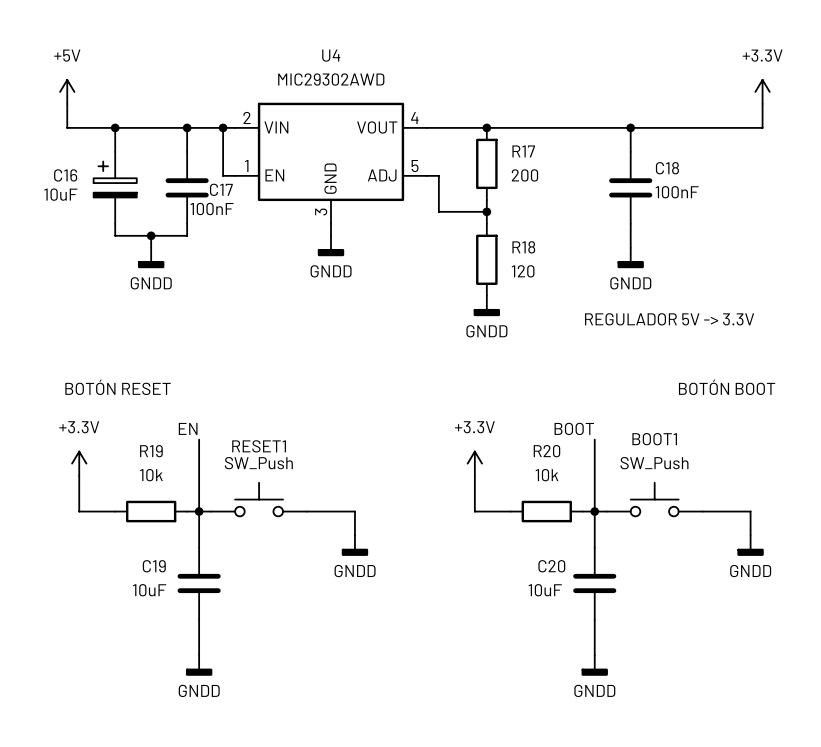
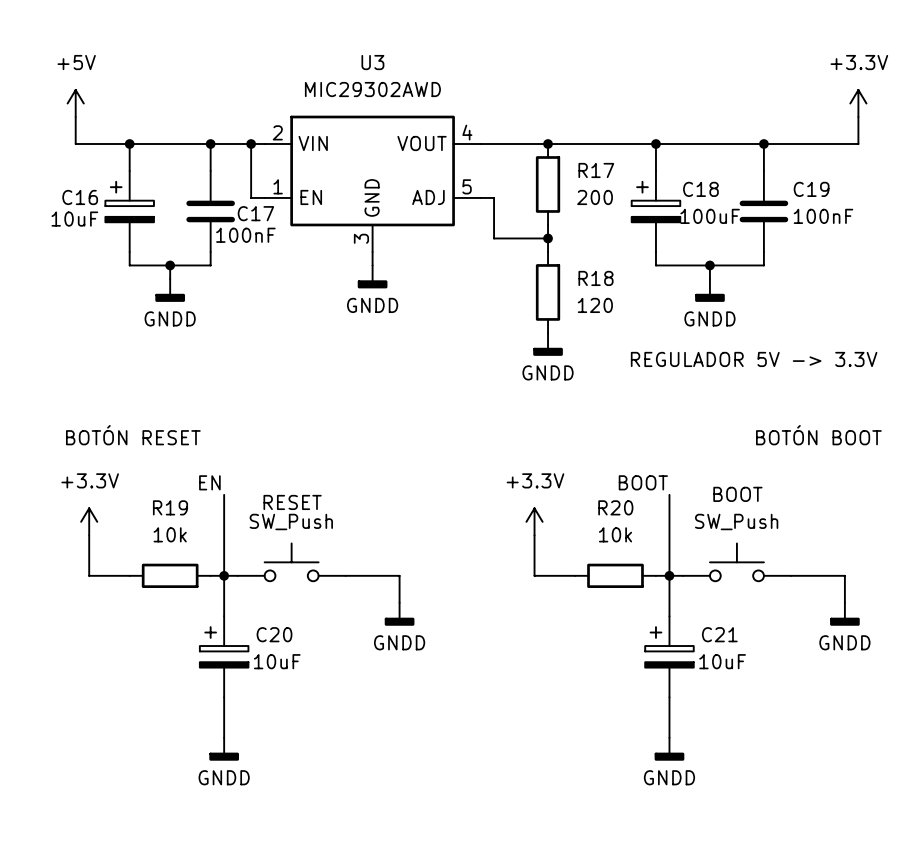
U4 name: U4 (331, 55) -> U3 (372, 62)
junction: none -> (655, 144)
wire: (630, 127) (630, 151) -> (655, 144) (655, 170)
junction: (630, 127) -> none
wire: none -> (763, 144) (763, 170)
junction: none -> (763, 144)
C18 symbol: [609, 151, 653, 224] -> [631, 170, 681, 252]
C18 value: 100nF (677, 192) -> 100uF (710, 216)
wire: none -> (655, 251) (655, 265) (763, 265) (763, 251)
wire: (630, 223) (630, 235) -> none
junction: none -> (709, 265)
BOOT1 name: BOOT1 (654, 439) -> BOOT (737, 494)
RESET1 name: RESET1 (259, 446) -> RESET (292, 502)
C20 symbol: [573, 547, 617, 620] -> [199, 616, 249, 698]
C19 name position: C19 (154, 566) -> C19 (811, 189)
C20 name position: C20 (551, 566) -> C20 (274, 634)
C19 position: (199, 583) -> (763, 211)
C21: none -> 10uF (669, 656)
C19 value: 10uF (149, 590) -> 100nF (823, 216)
C20 value position: 10uF (545, 590) -> 10uF (277, 661)

